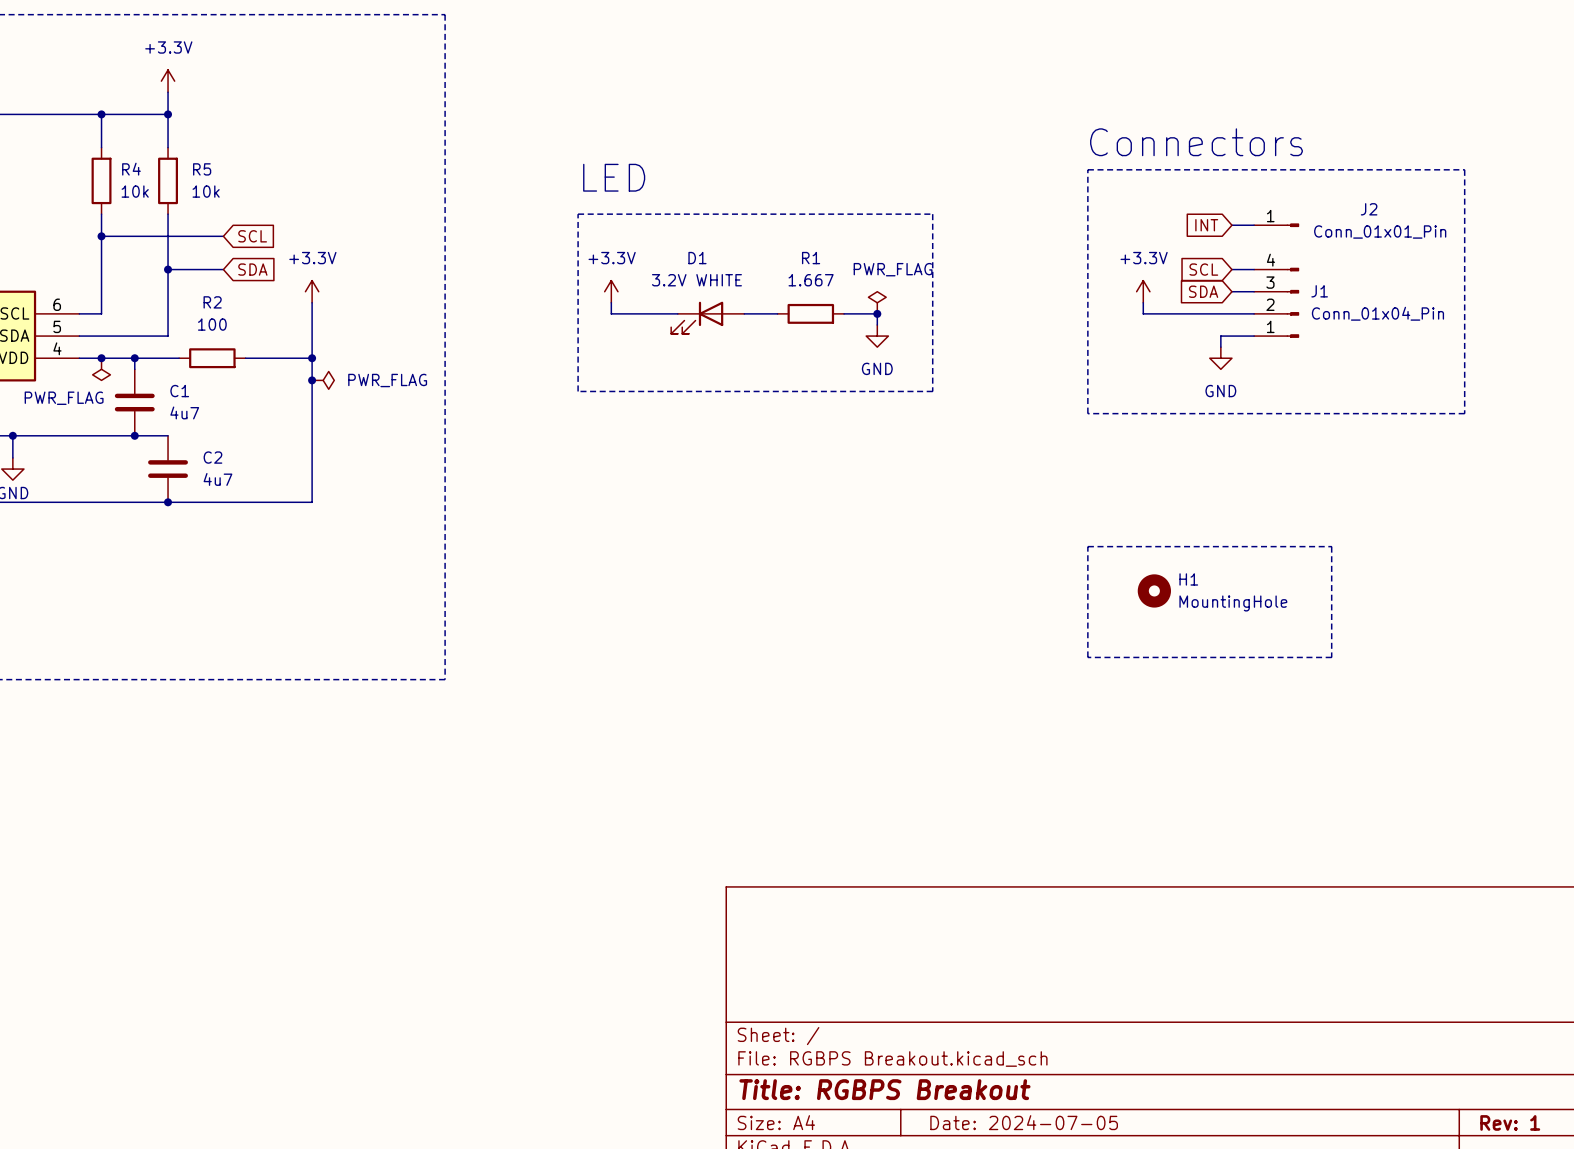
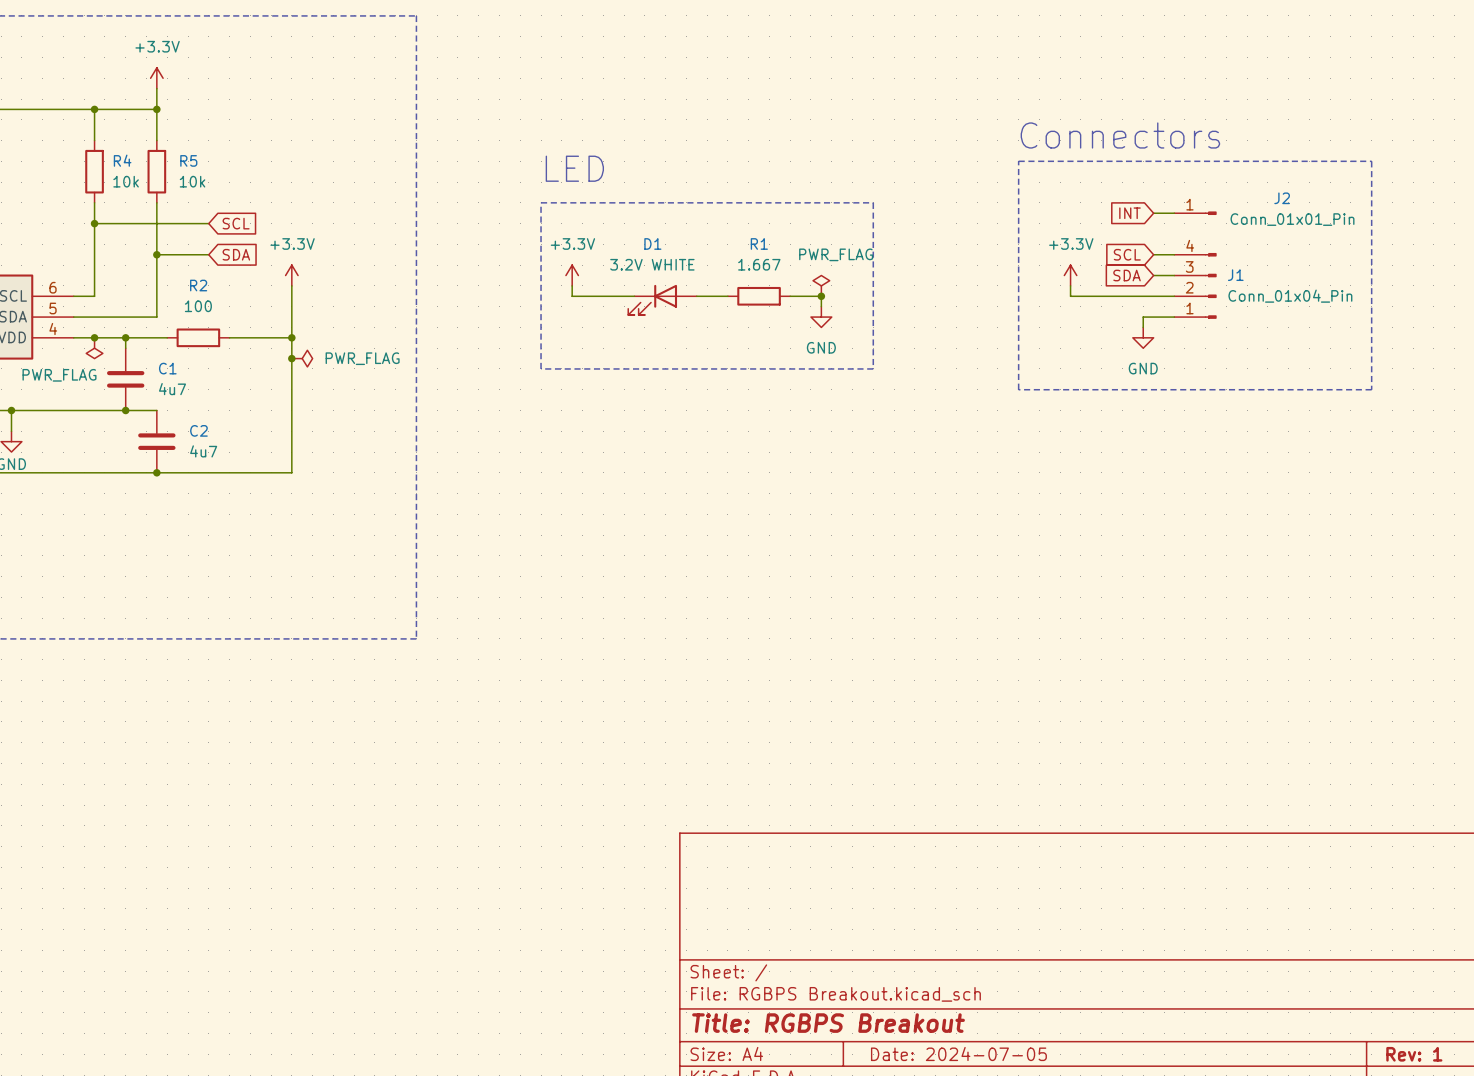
line: (1087, 546) (1331, 546) (1331, 657) (1087, 657) (1087, 546) -> none
H1: MountingHole (1154, 590) -> none

